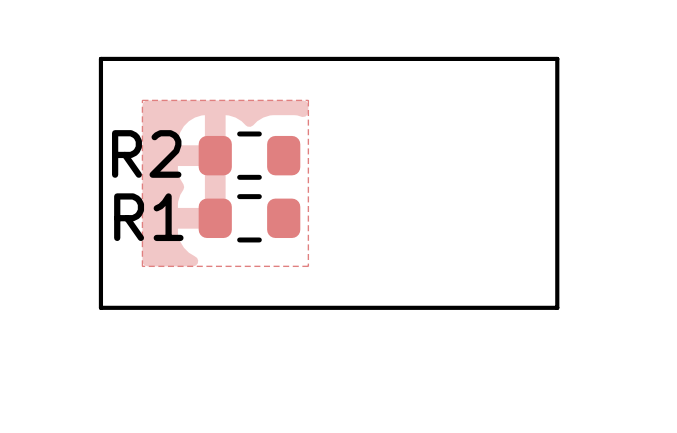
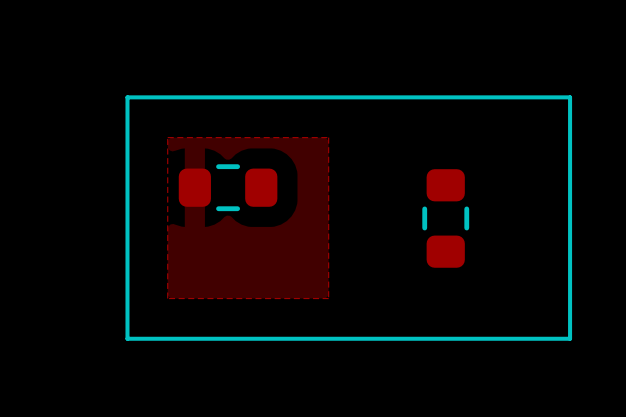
part: none -> (228, 187)
R2: (249, 155) -> none
part: none -> (445, 218)
R1: (249, 218) -> none

